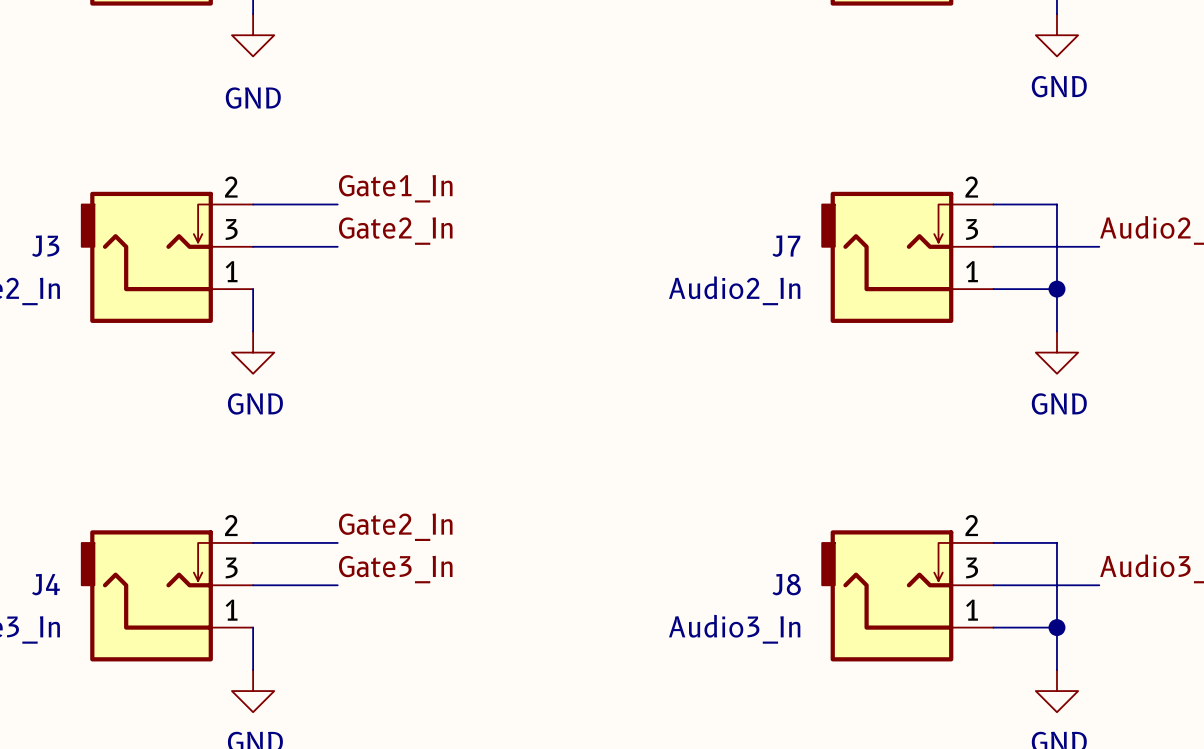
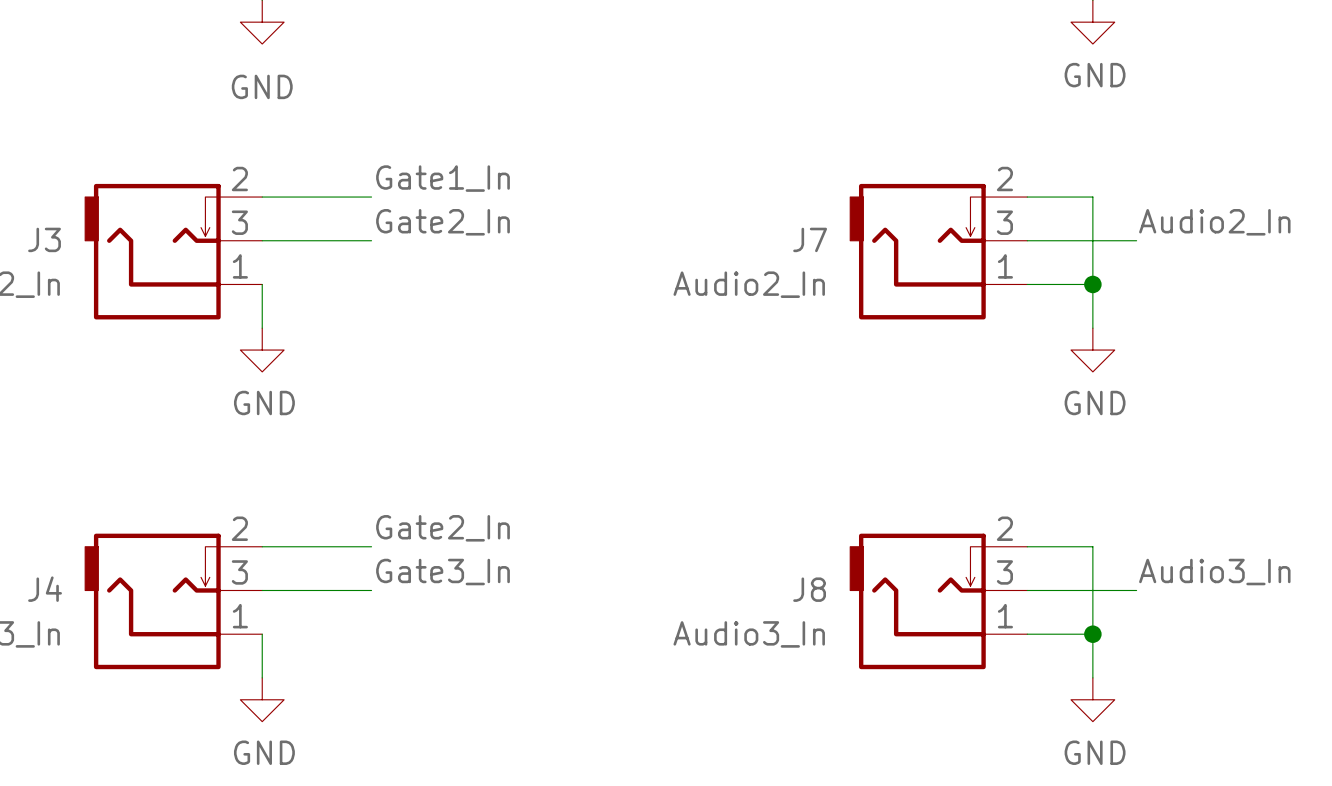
label position: Gate1_In (395, 188) -> Gate1_In (443, 178)
wire: none -> (349, 197) (371, 197)
label position: Gate2_In (395, 231) -> Gate2_In (443, 222)
wire: none -> (349, 240) (371, 240)
label position: Gate2_In (395, 527) -> Gate2_In (443, 528)
wire: none -> (349, 546) (371, 546)
label position: Gate3_In (395, 569) -> Gate3_In (443, 572)
wire: none -> (349, 590) (371, 590)

